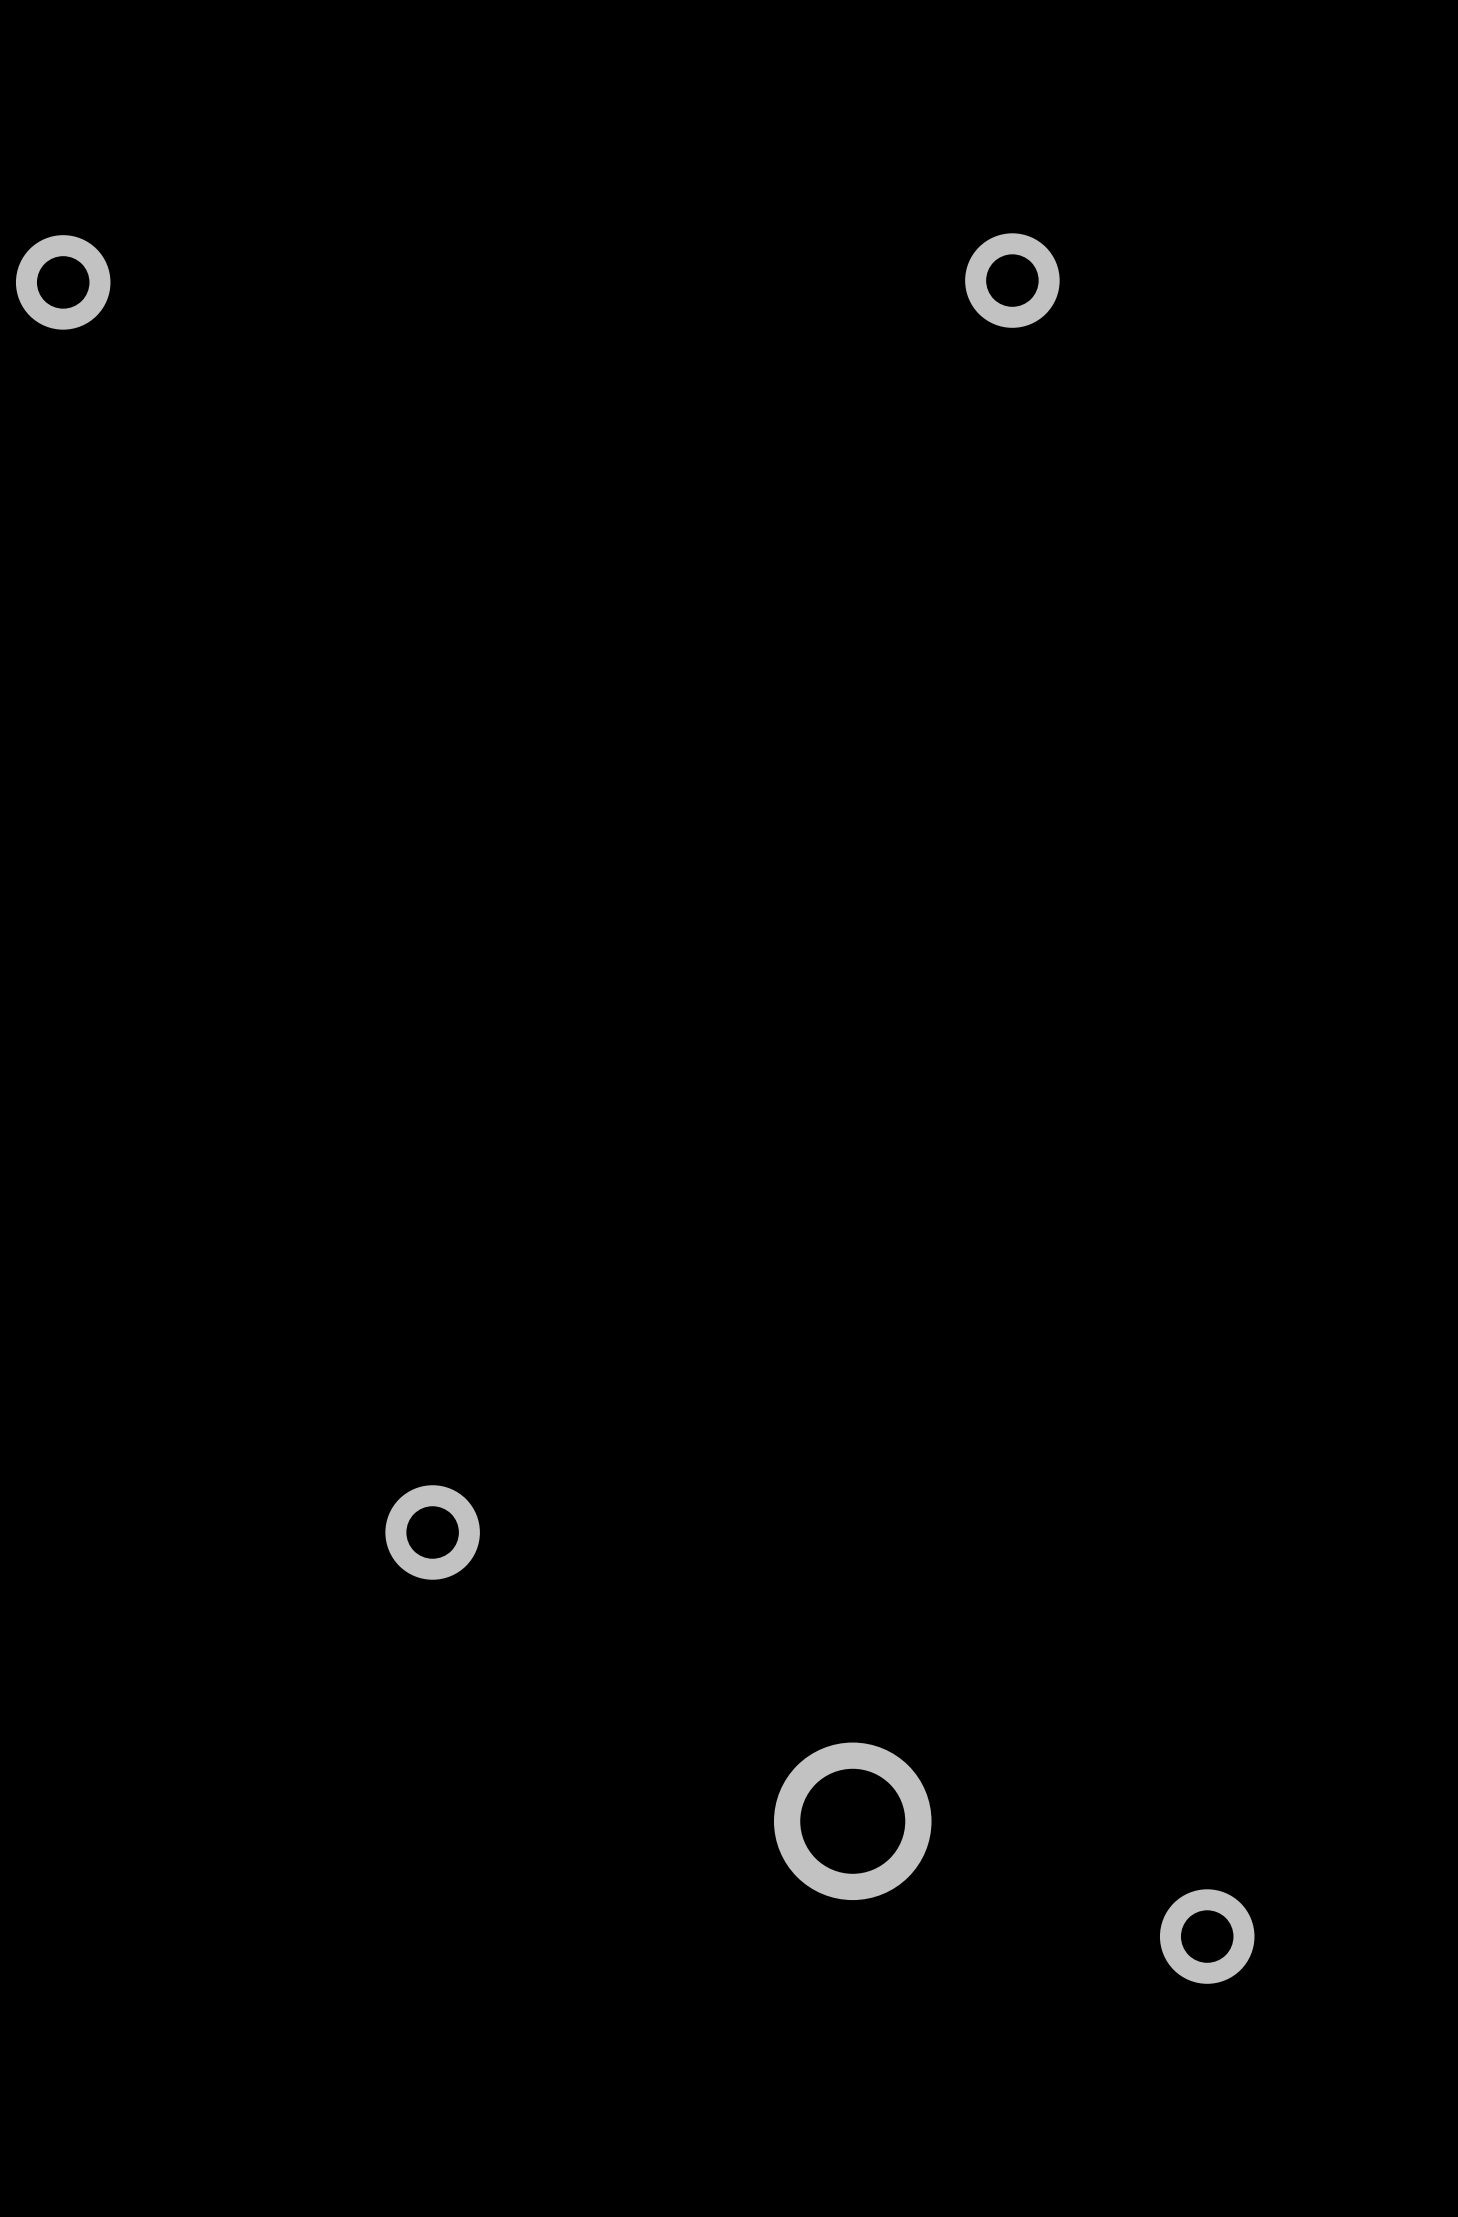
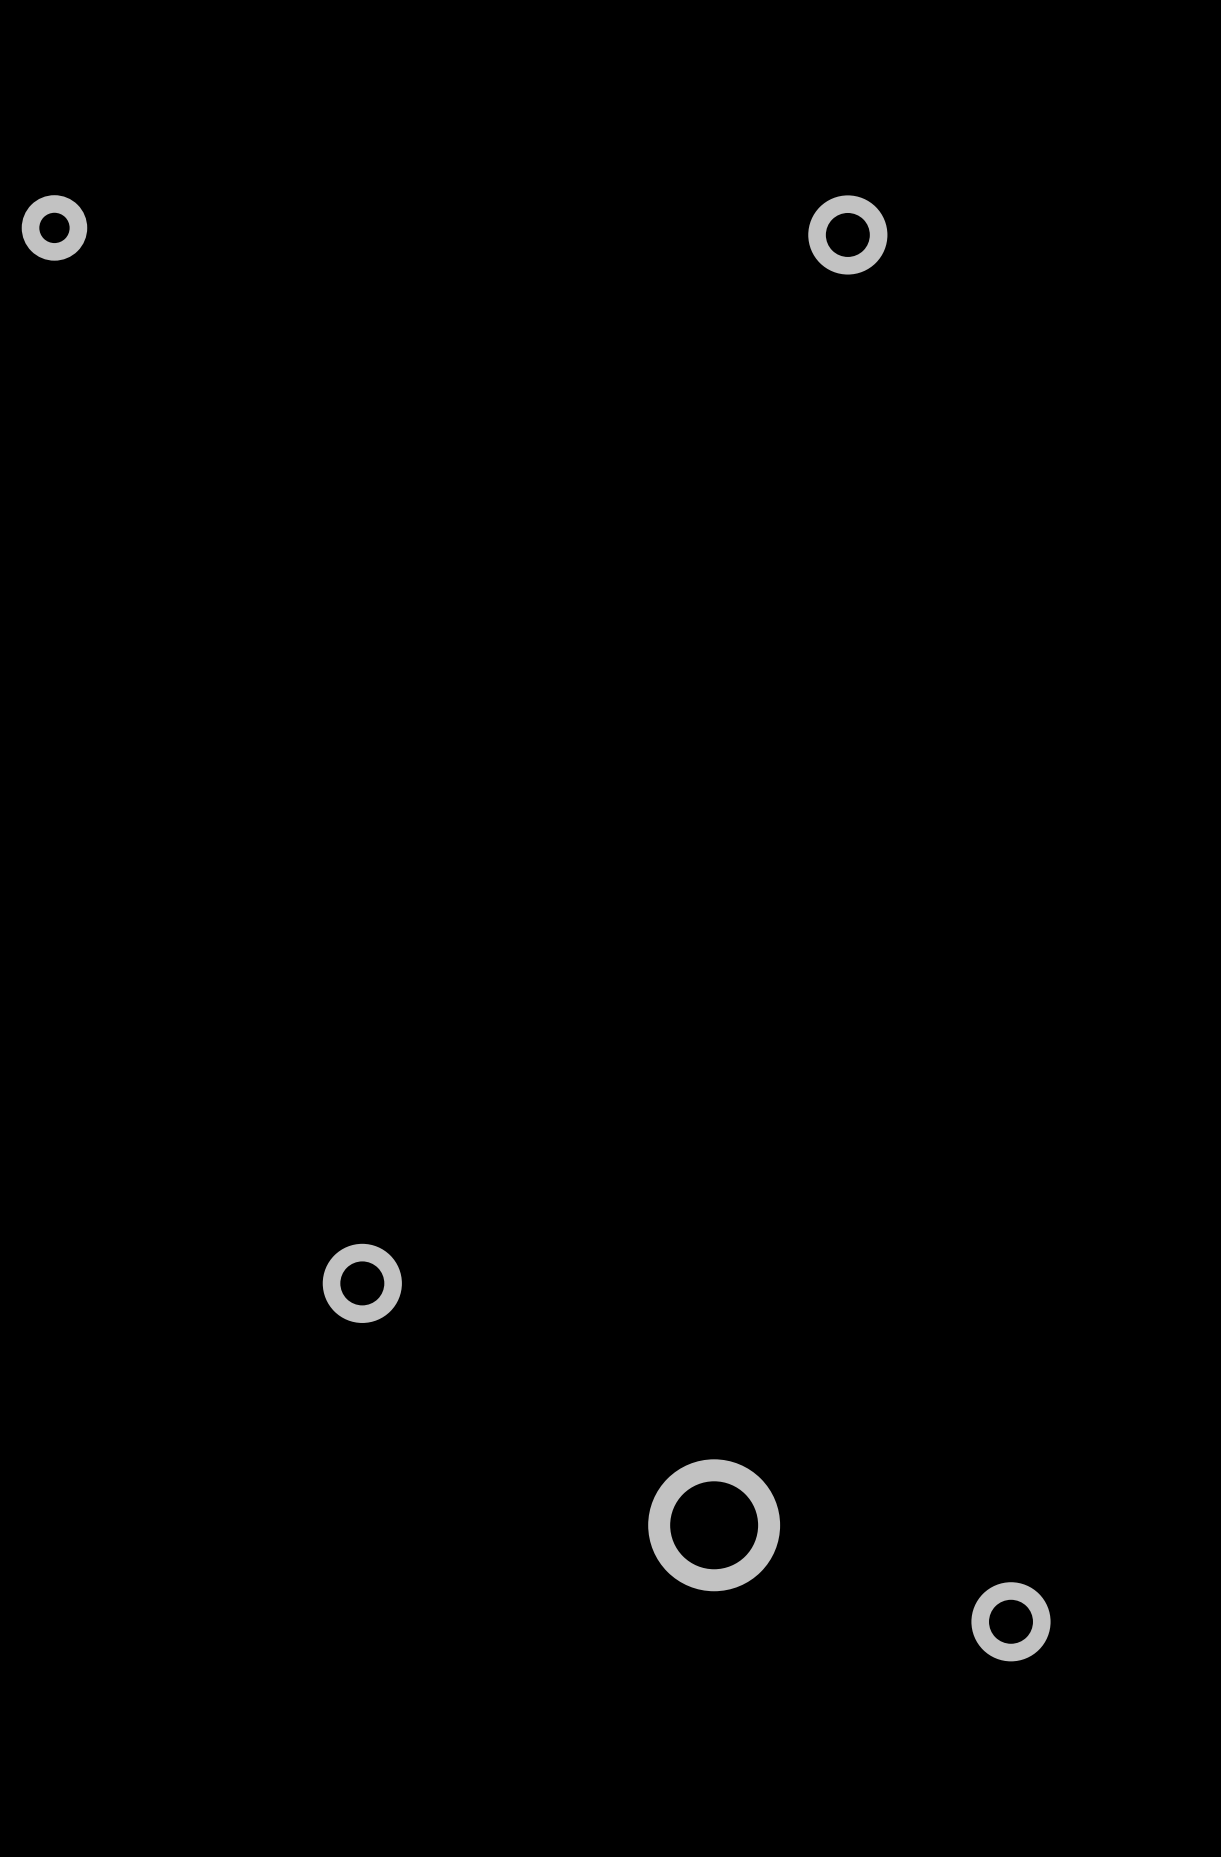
via size: [15, 235, 111, 330] -> [21, 195, 88, 261]

